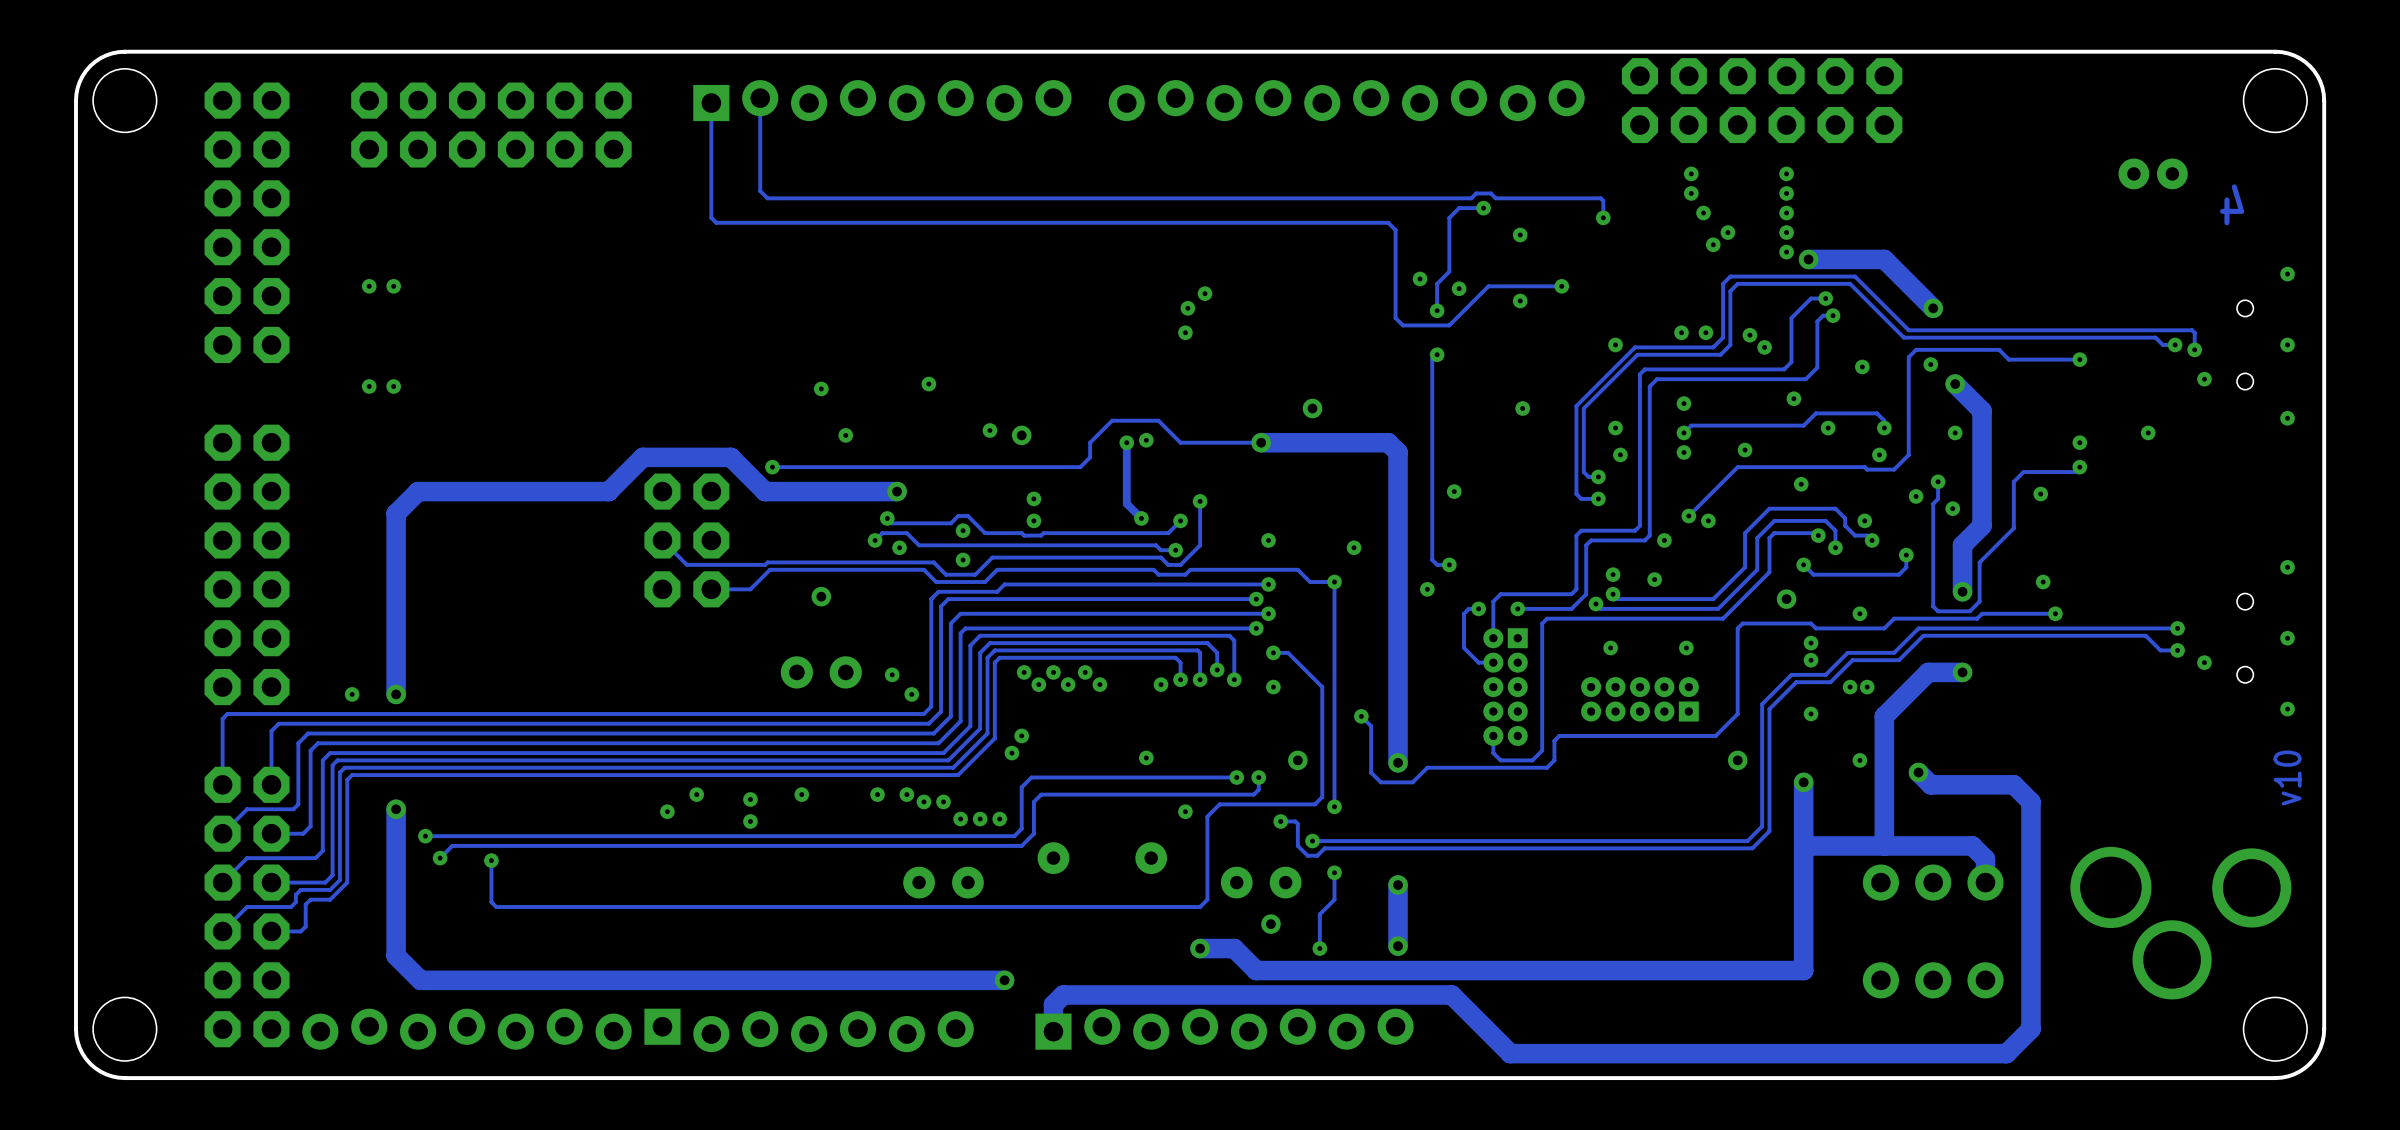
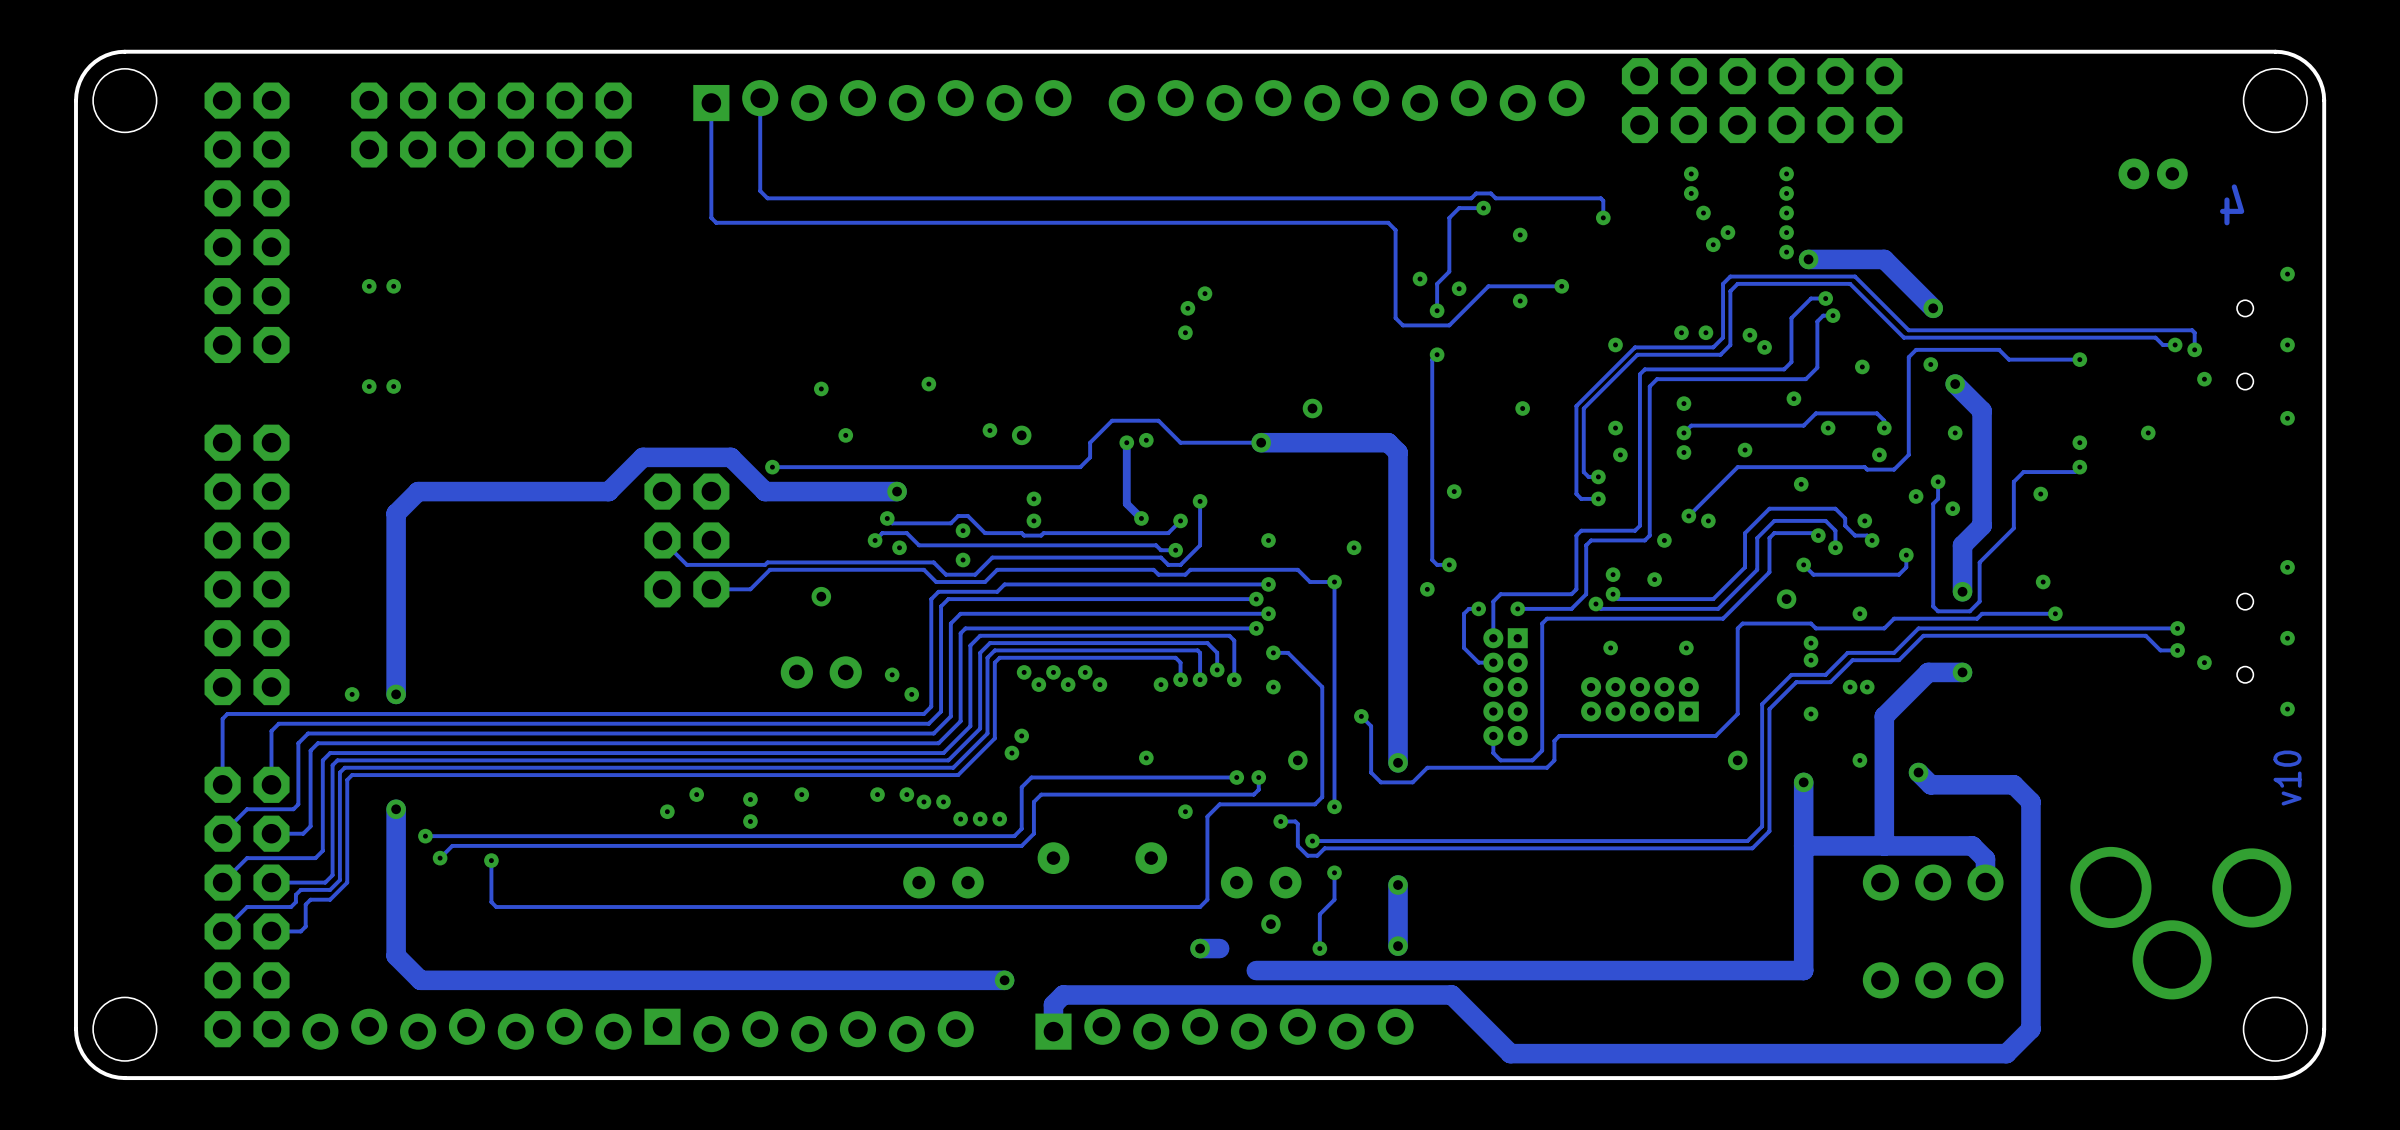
track: (1219, 948) (1234, 948) (1256, 970) -> none

